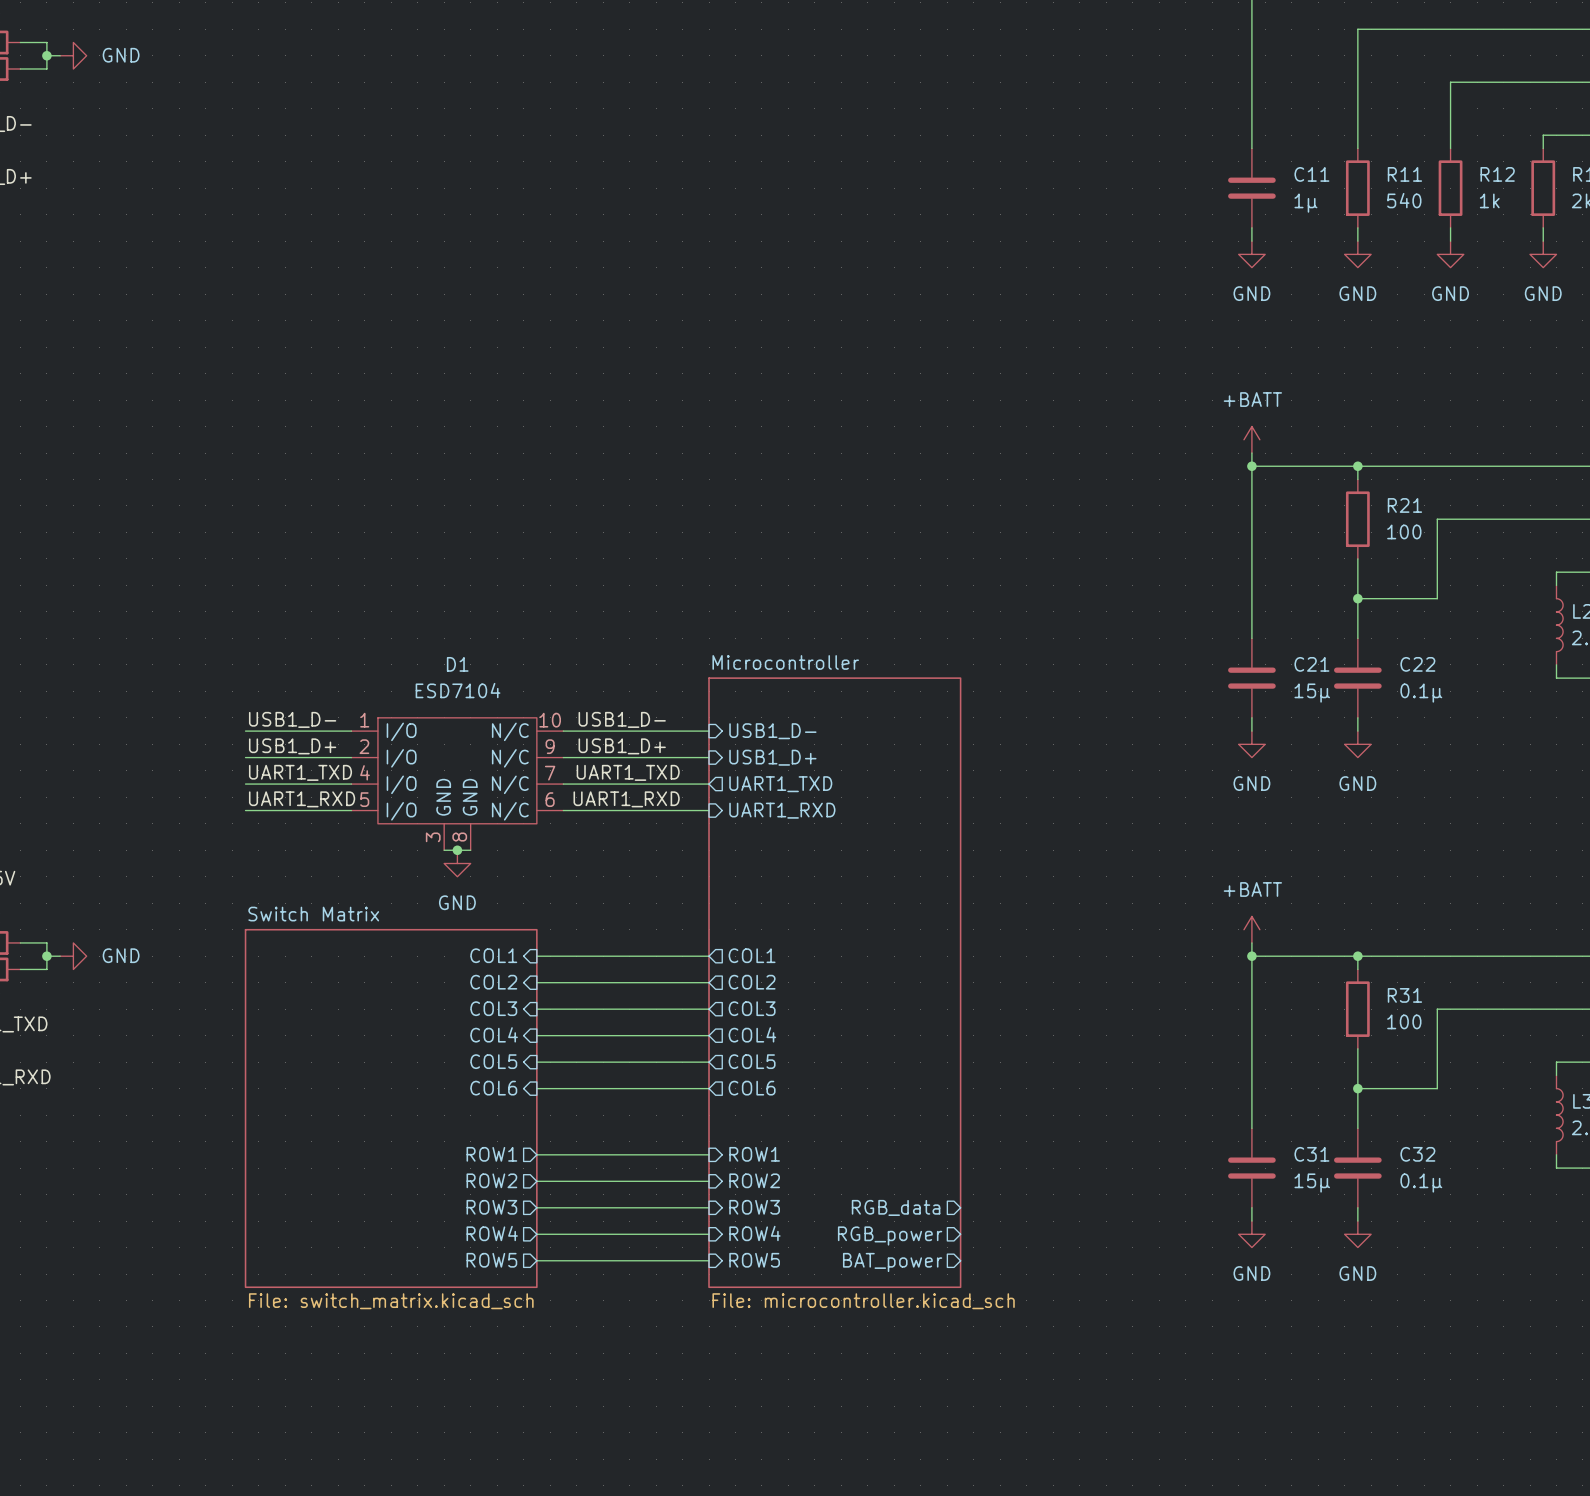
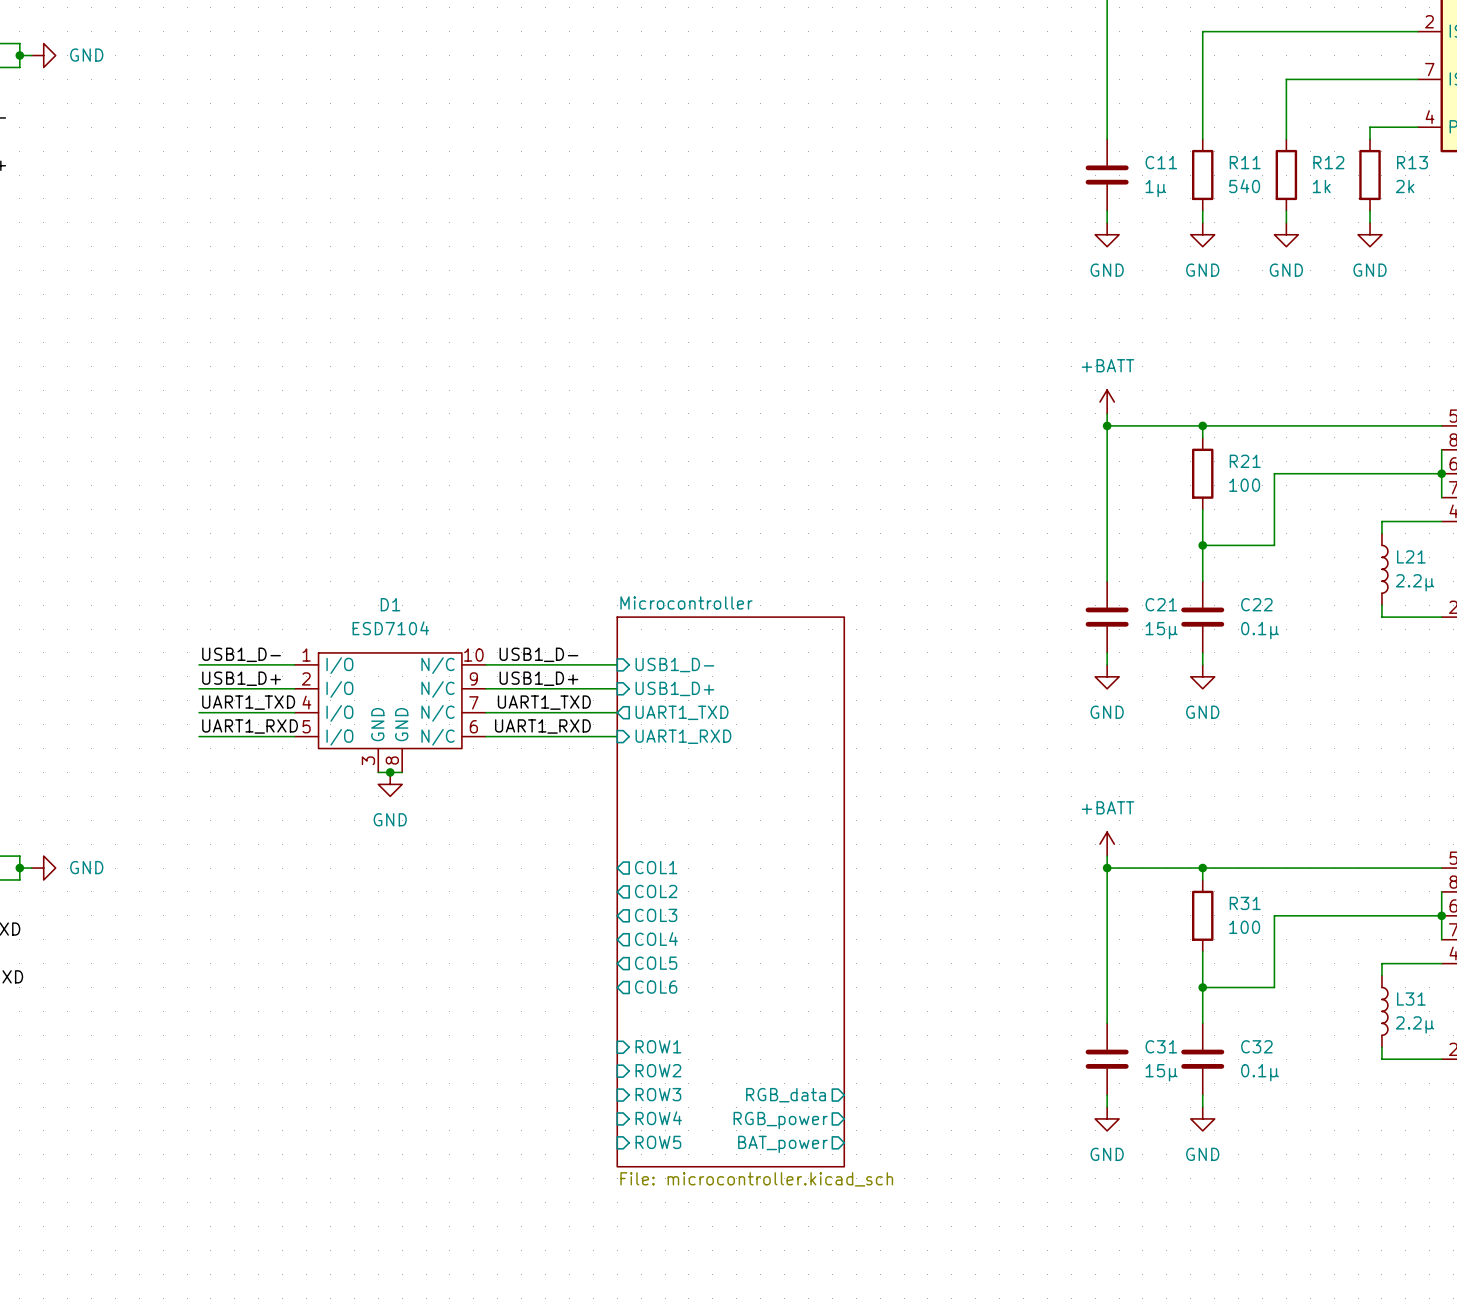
sheet pin: COL1 (493, 955) -> none
wire: (536, 956) (709, 956) -> none
sheet pin: COL2 (493, 982) -> none
wire: (536, 982) (709, 982) -> none
sheet pin: COL3 (493, 1008) -> none
wire: (536, 1009) (709, 1009) -> none
sheet pin: COL4 (494, 1034) -> none
wire: (536, 1035) (709, 1035) -> none
sheet pin: COL5 (493, 1061) -> none
wire: (536, 1062) (709, 1062) -> none
sheet pin: COL6 (493, 1088) -> none
wire: (536, 1088) (709, 1088) -> none
sheet Switch Matrix: File: switch_matrix.kicad_sch (391, 1108) -> none
sheet pin: ROW1 (491, 1154) -> none
wire: (536, 1154) (709, 1154) -> none
sheet pin: ROW2 (491, 1180) -> none
wire: (536, 1181) (709, 1181) -> none
sheet pin: ROW3 (491, 1207) -> none
wire: (536, 1207) (709, 1207) -> none
sheet pin: ROW4 (492, 1233) -> none
wire: (536, 1234) (709, 1234) -> none
sheet pin: ROW5 (491, 1260) -> none
wire: (536, 1260) (709, 1260) -> none

